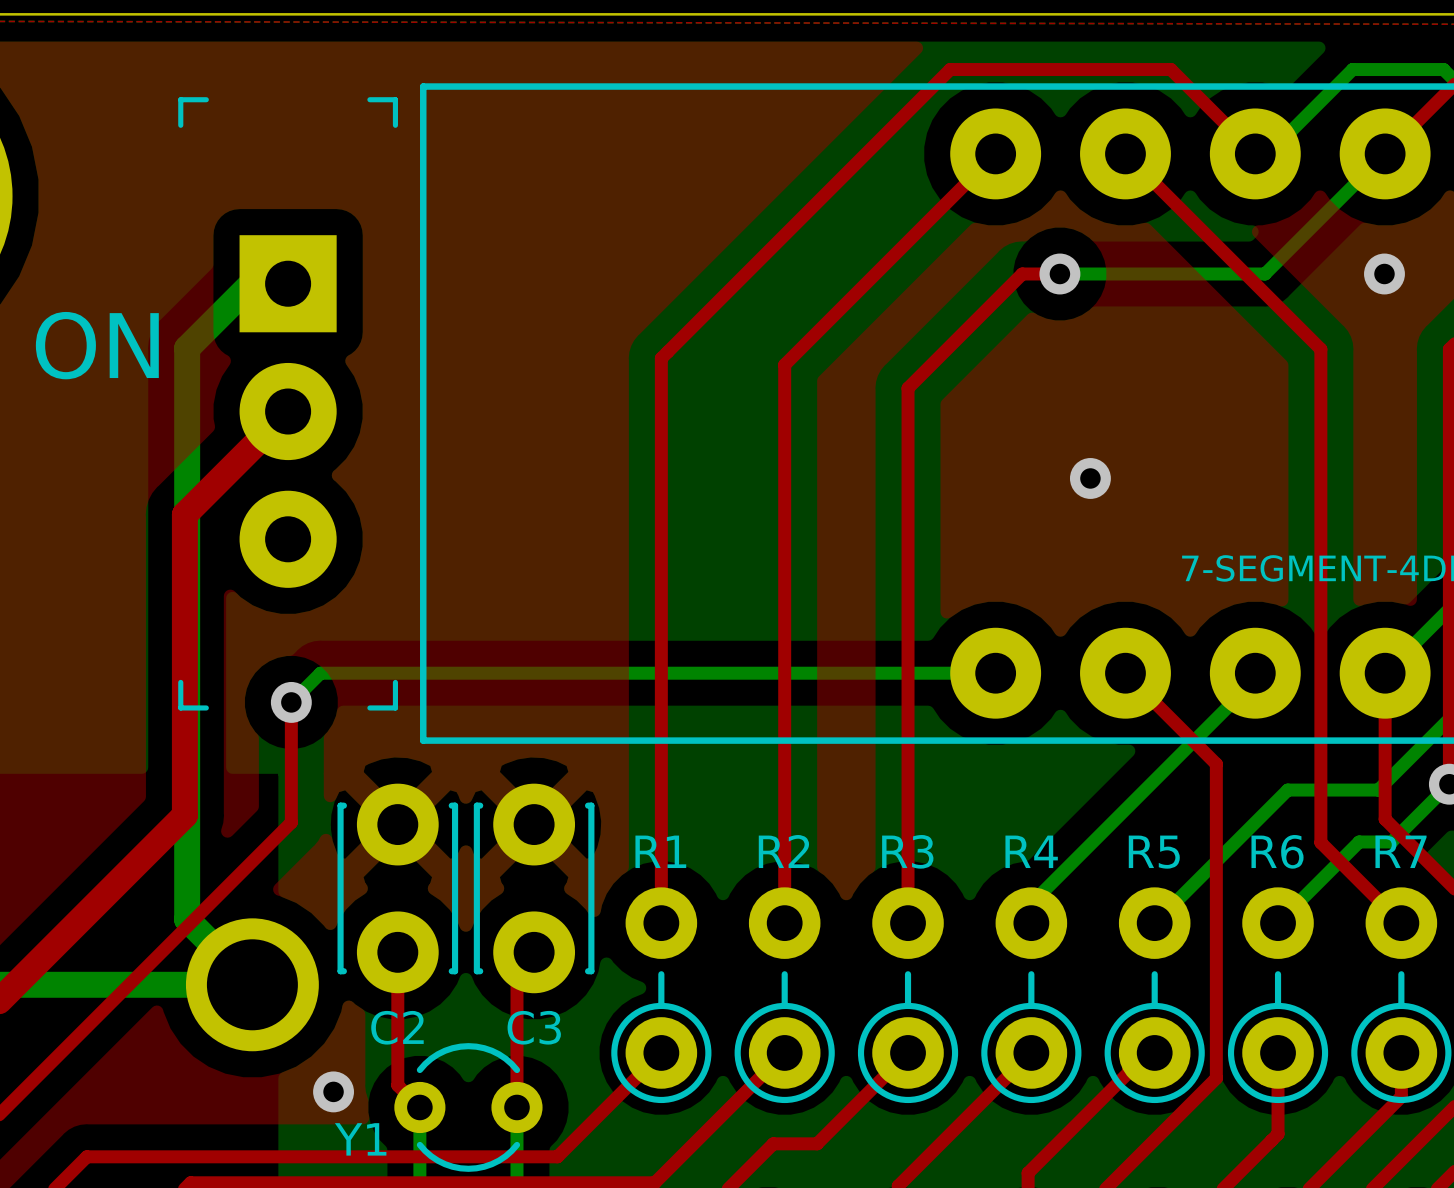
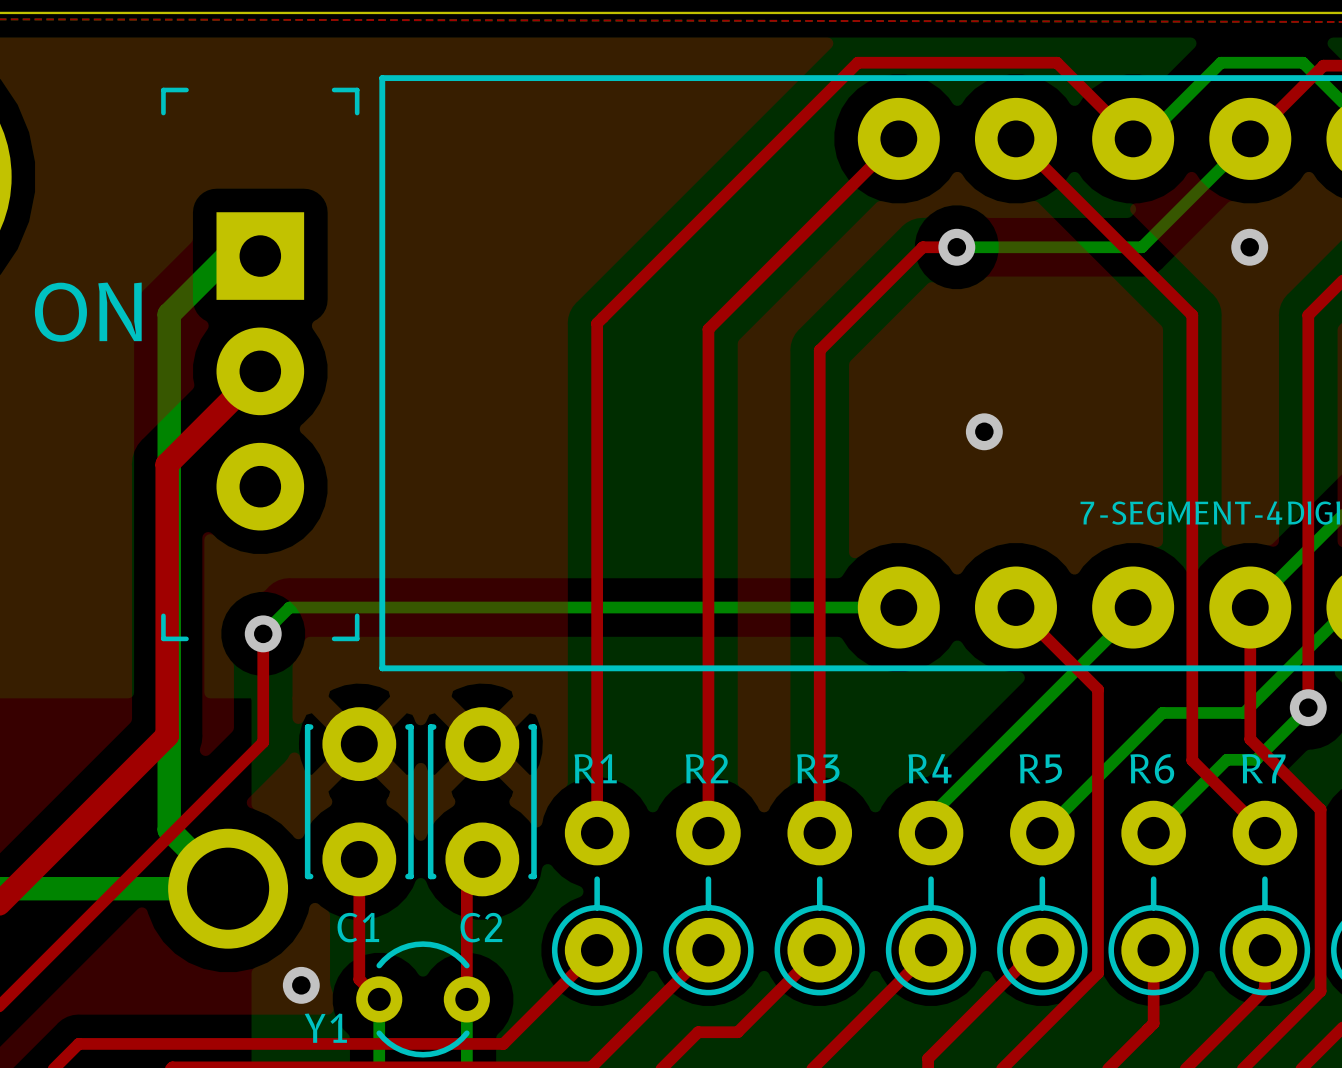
C2 name: C2 (397, 1027) -> C1 (358, 927)
C3 name: C3 (534, 1027) -> C2 (481, 927)

